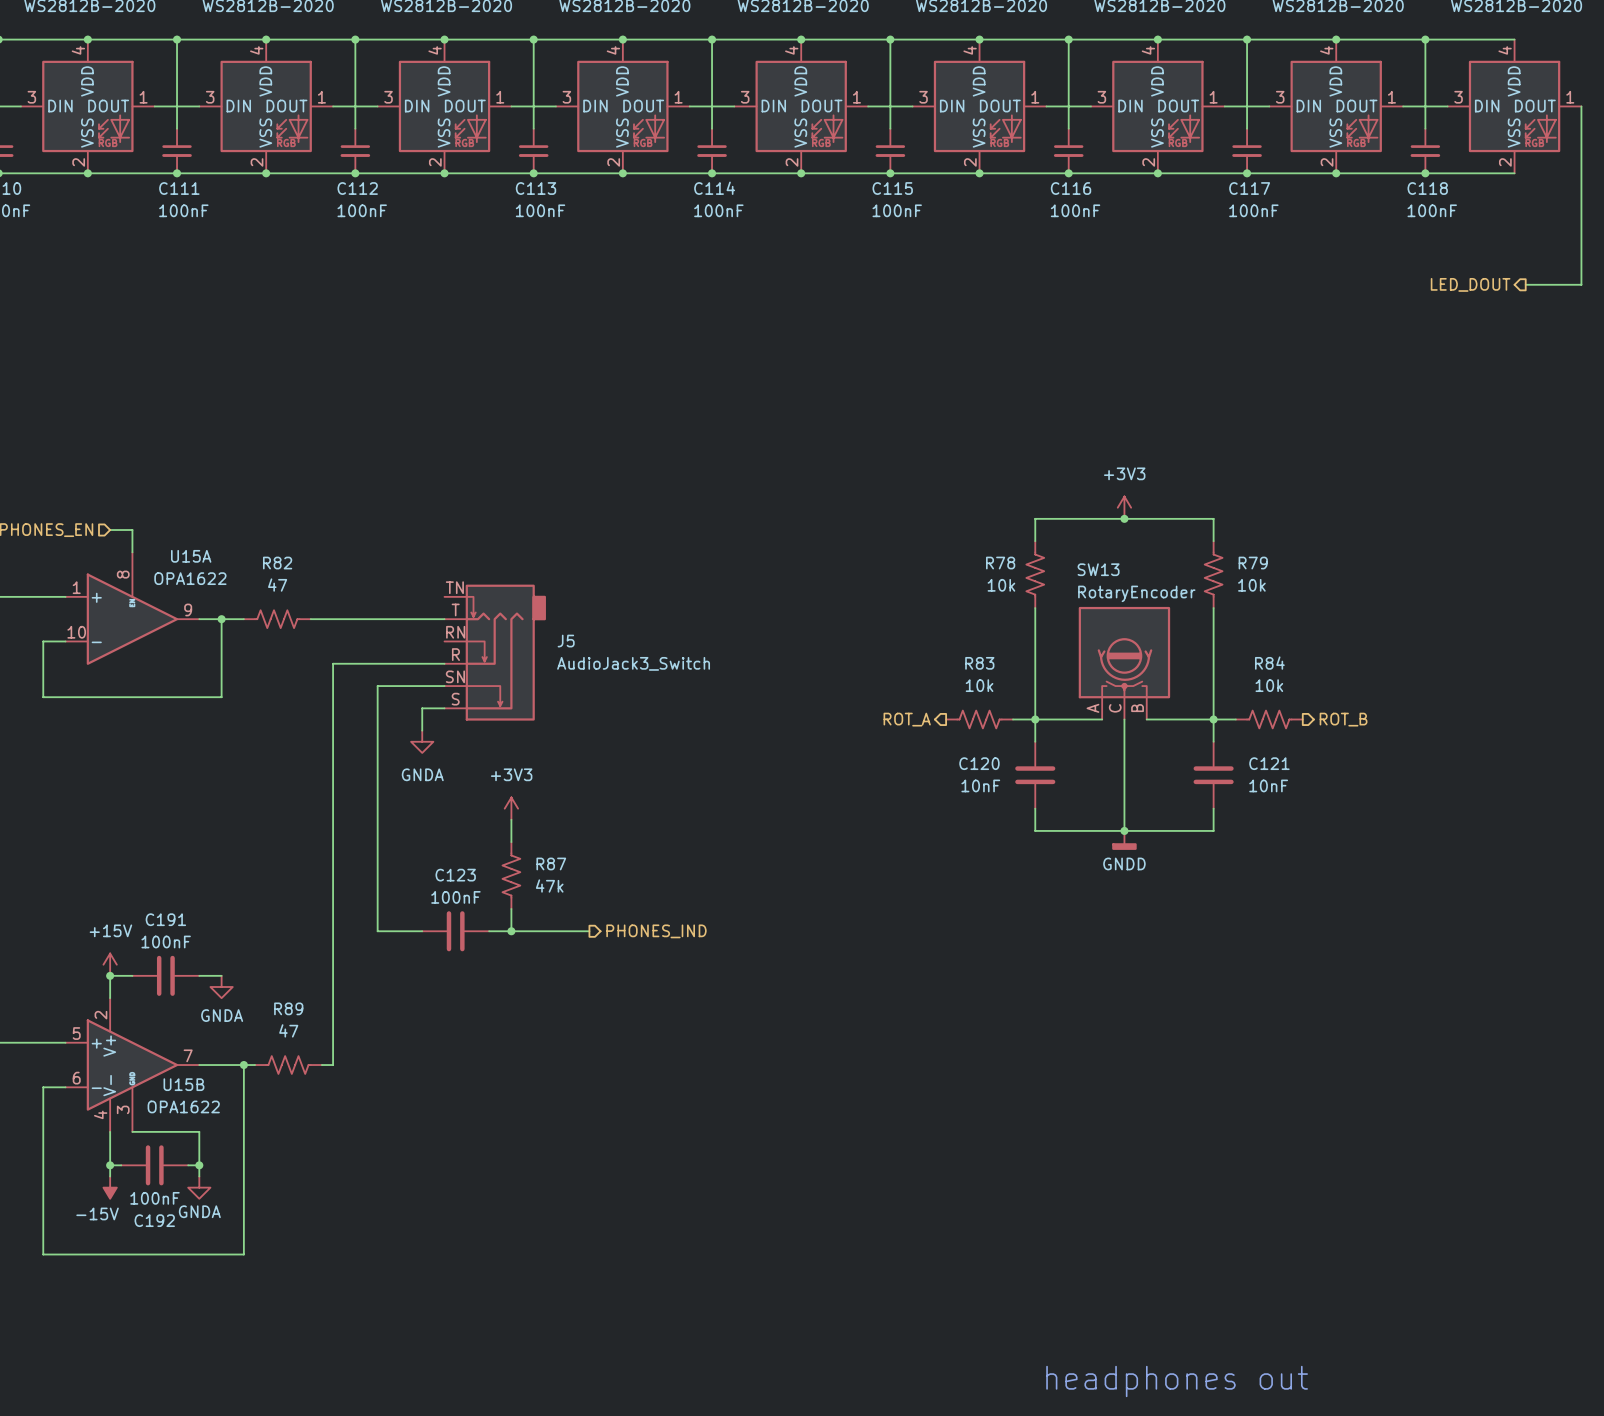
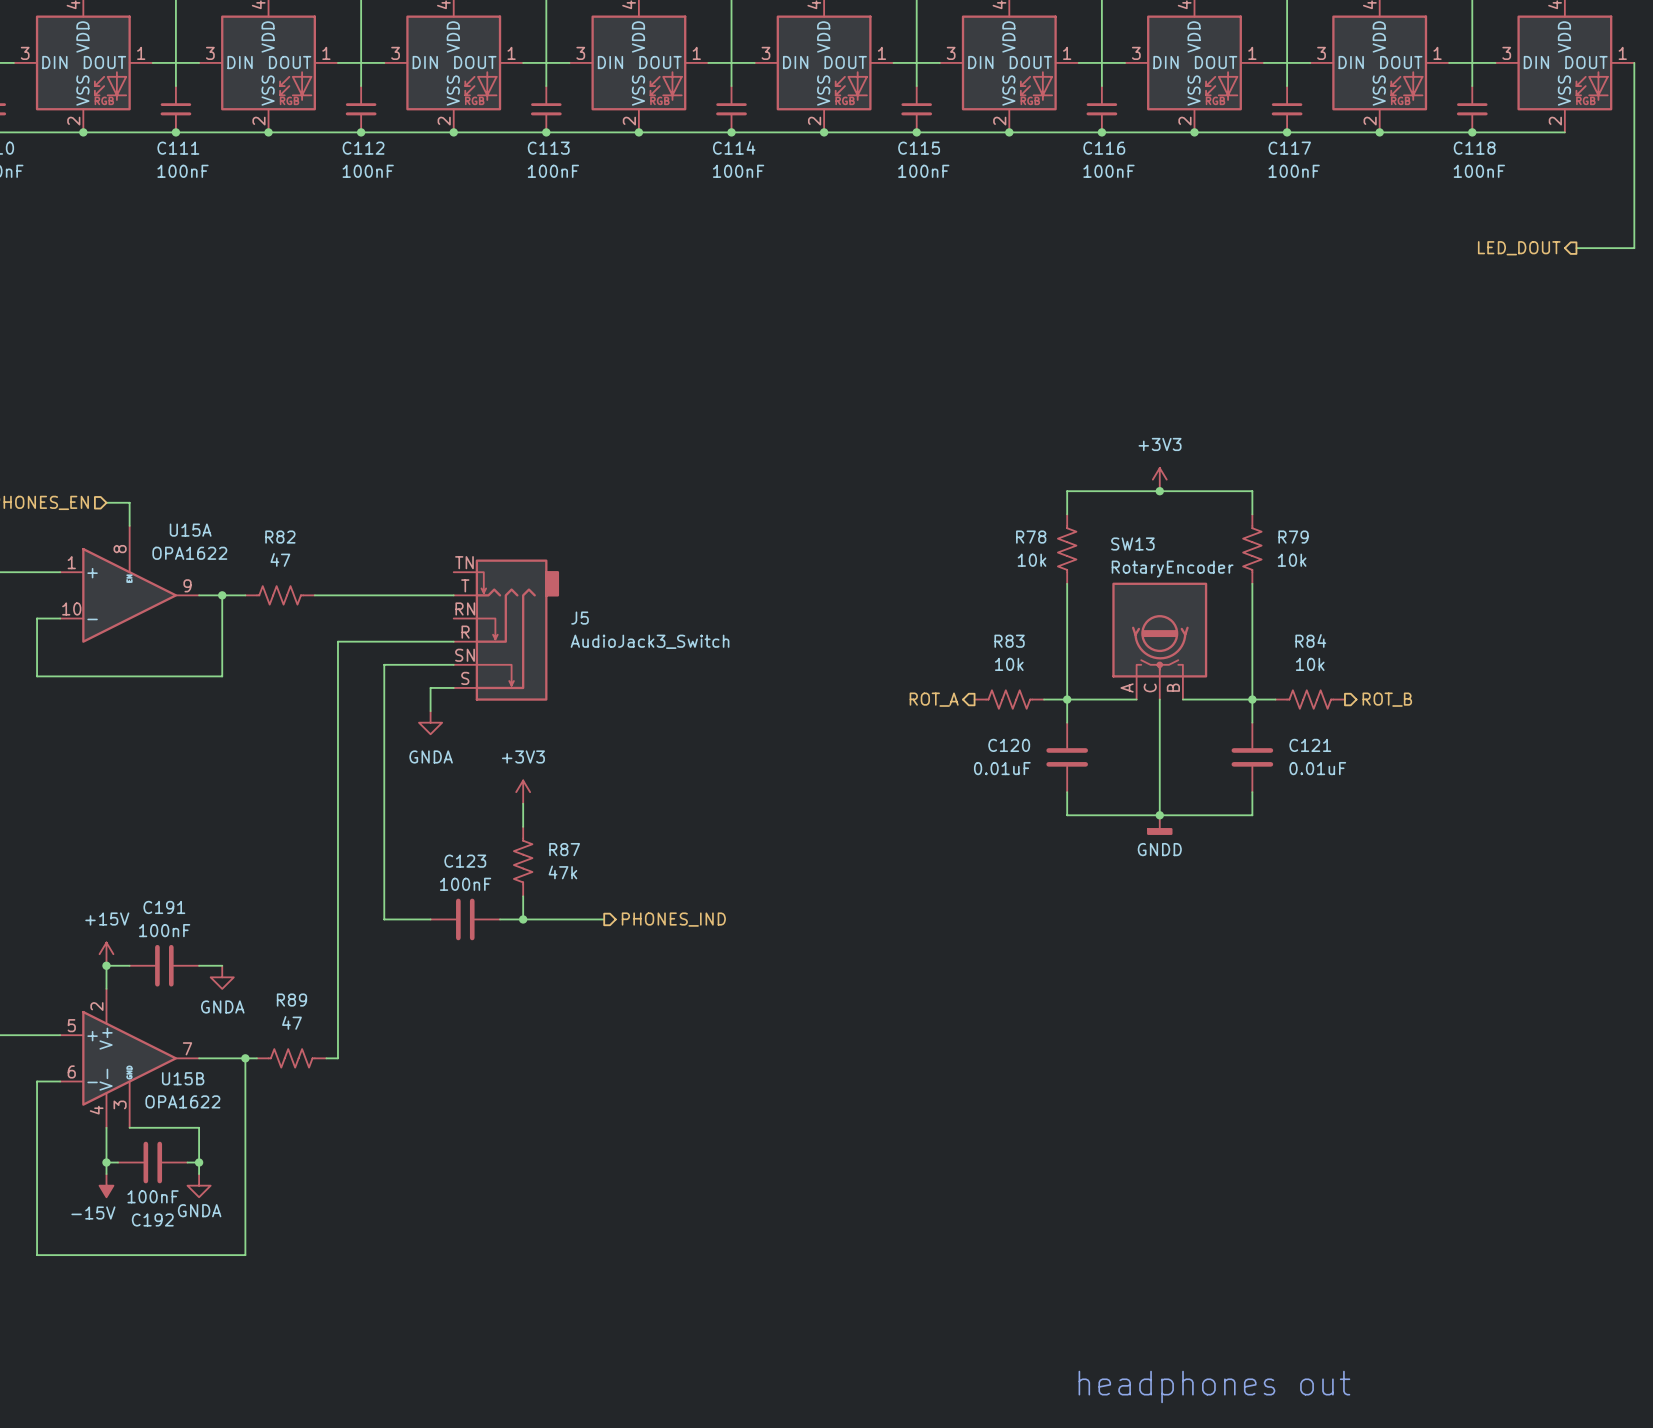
C120 value: 10nF (980, 785) -> 0.01uF (1002, 768)
C121 value: 10nF (1268, 785) -> 0.01uF (1317, 768)

